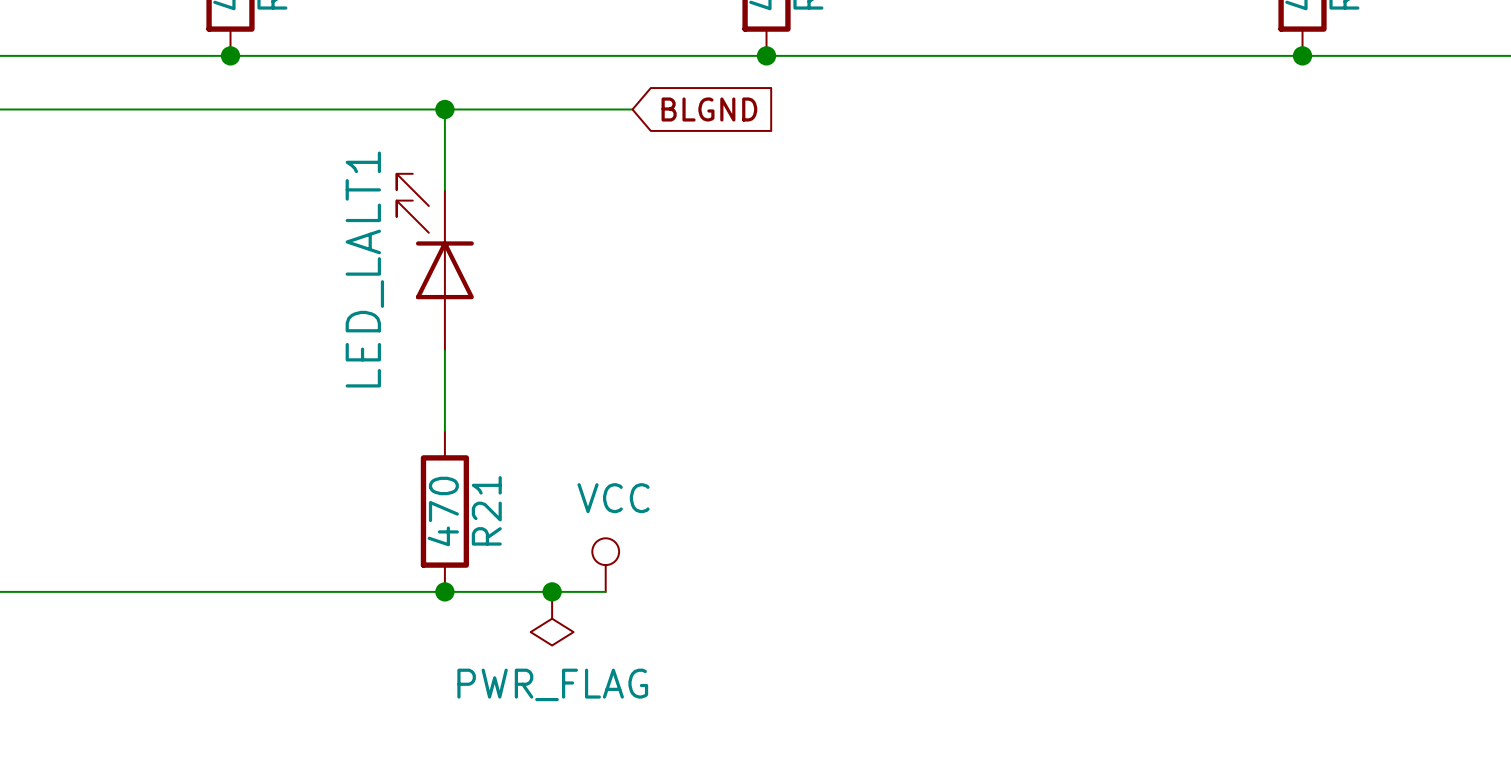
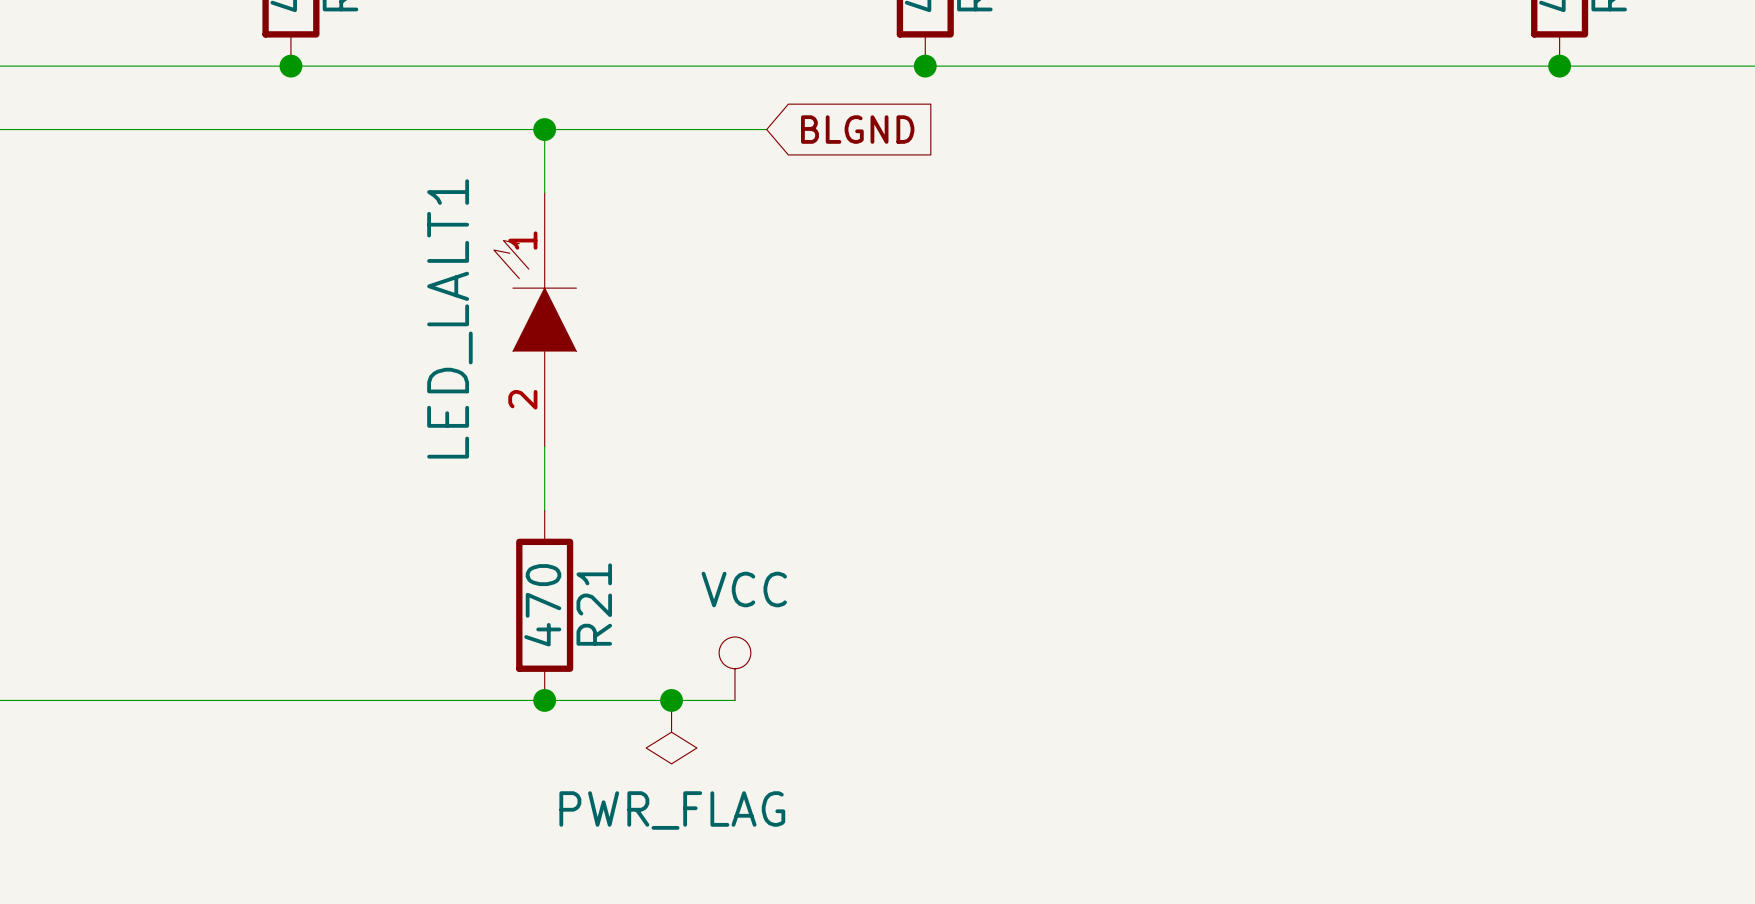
LED_LALT1 symbol: [396, 173, 474, 351] -> [493, 192, 577, 447]

